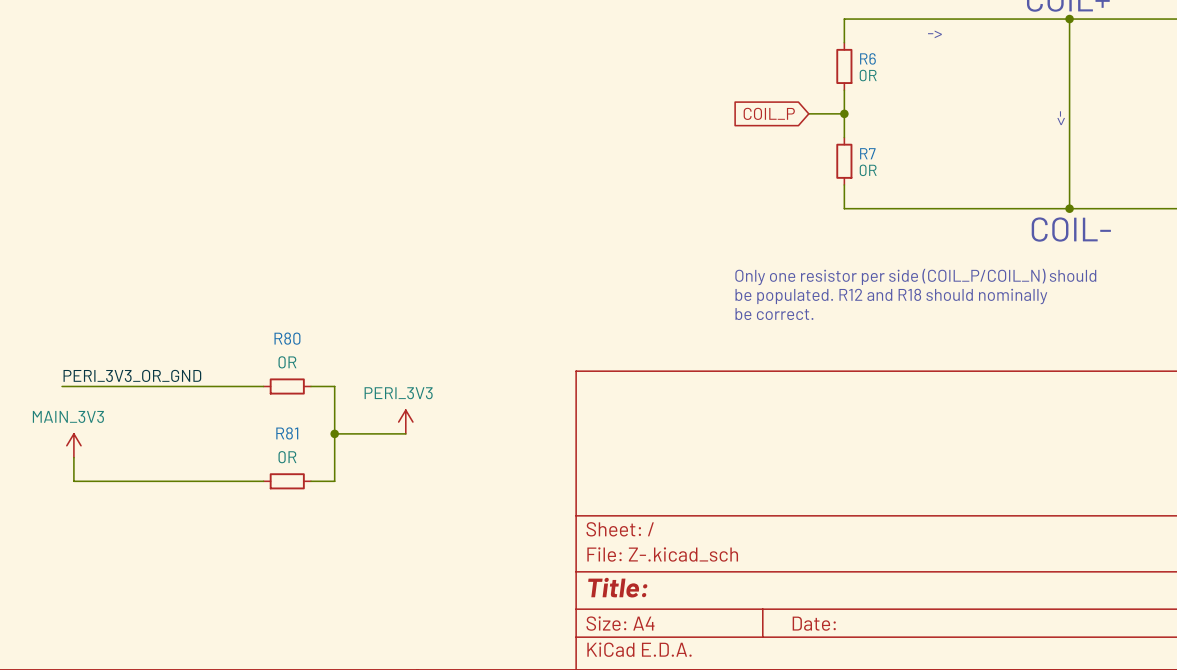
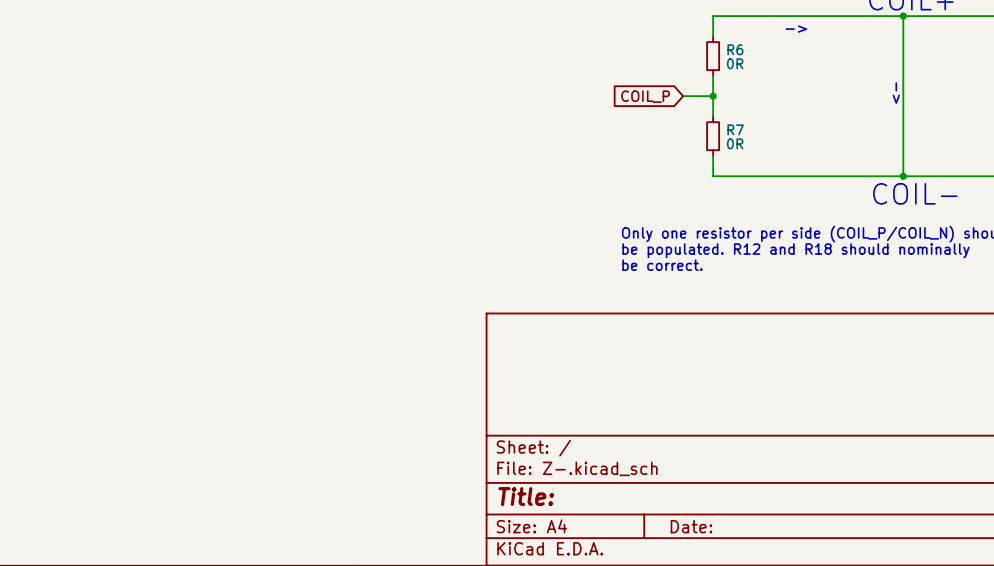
label: PERI_3V3_OR_GND (132, 375) -> none
wire: (62, 386) (263, 386) -> none
R80: 0R (287, 386) -> none
wire: (310, 386) (334, 386) (334, 481) (310, 481) -> none
power symbol: PERI_3V3 (405, 422) -> none
wire: (334, 433) (405, 433) -> none
junction: (334, 433) -> none
power symbol: MAIN_3V3 (73, 445) -> none
wire: (73, 457) (73, 481) (263, 481) -> none
R81: 0R (287, 481) -> none

